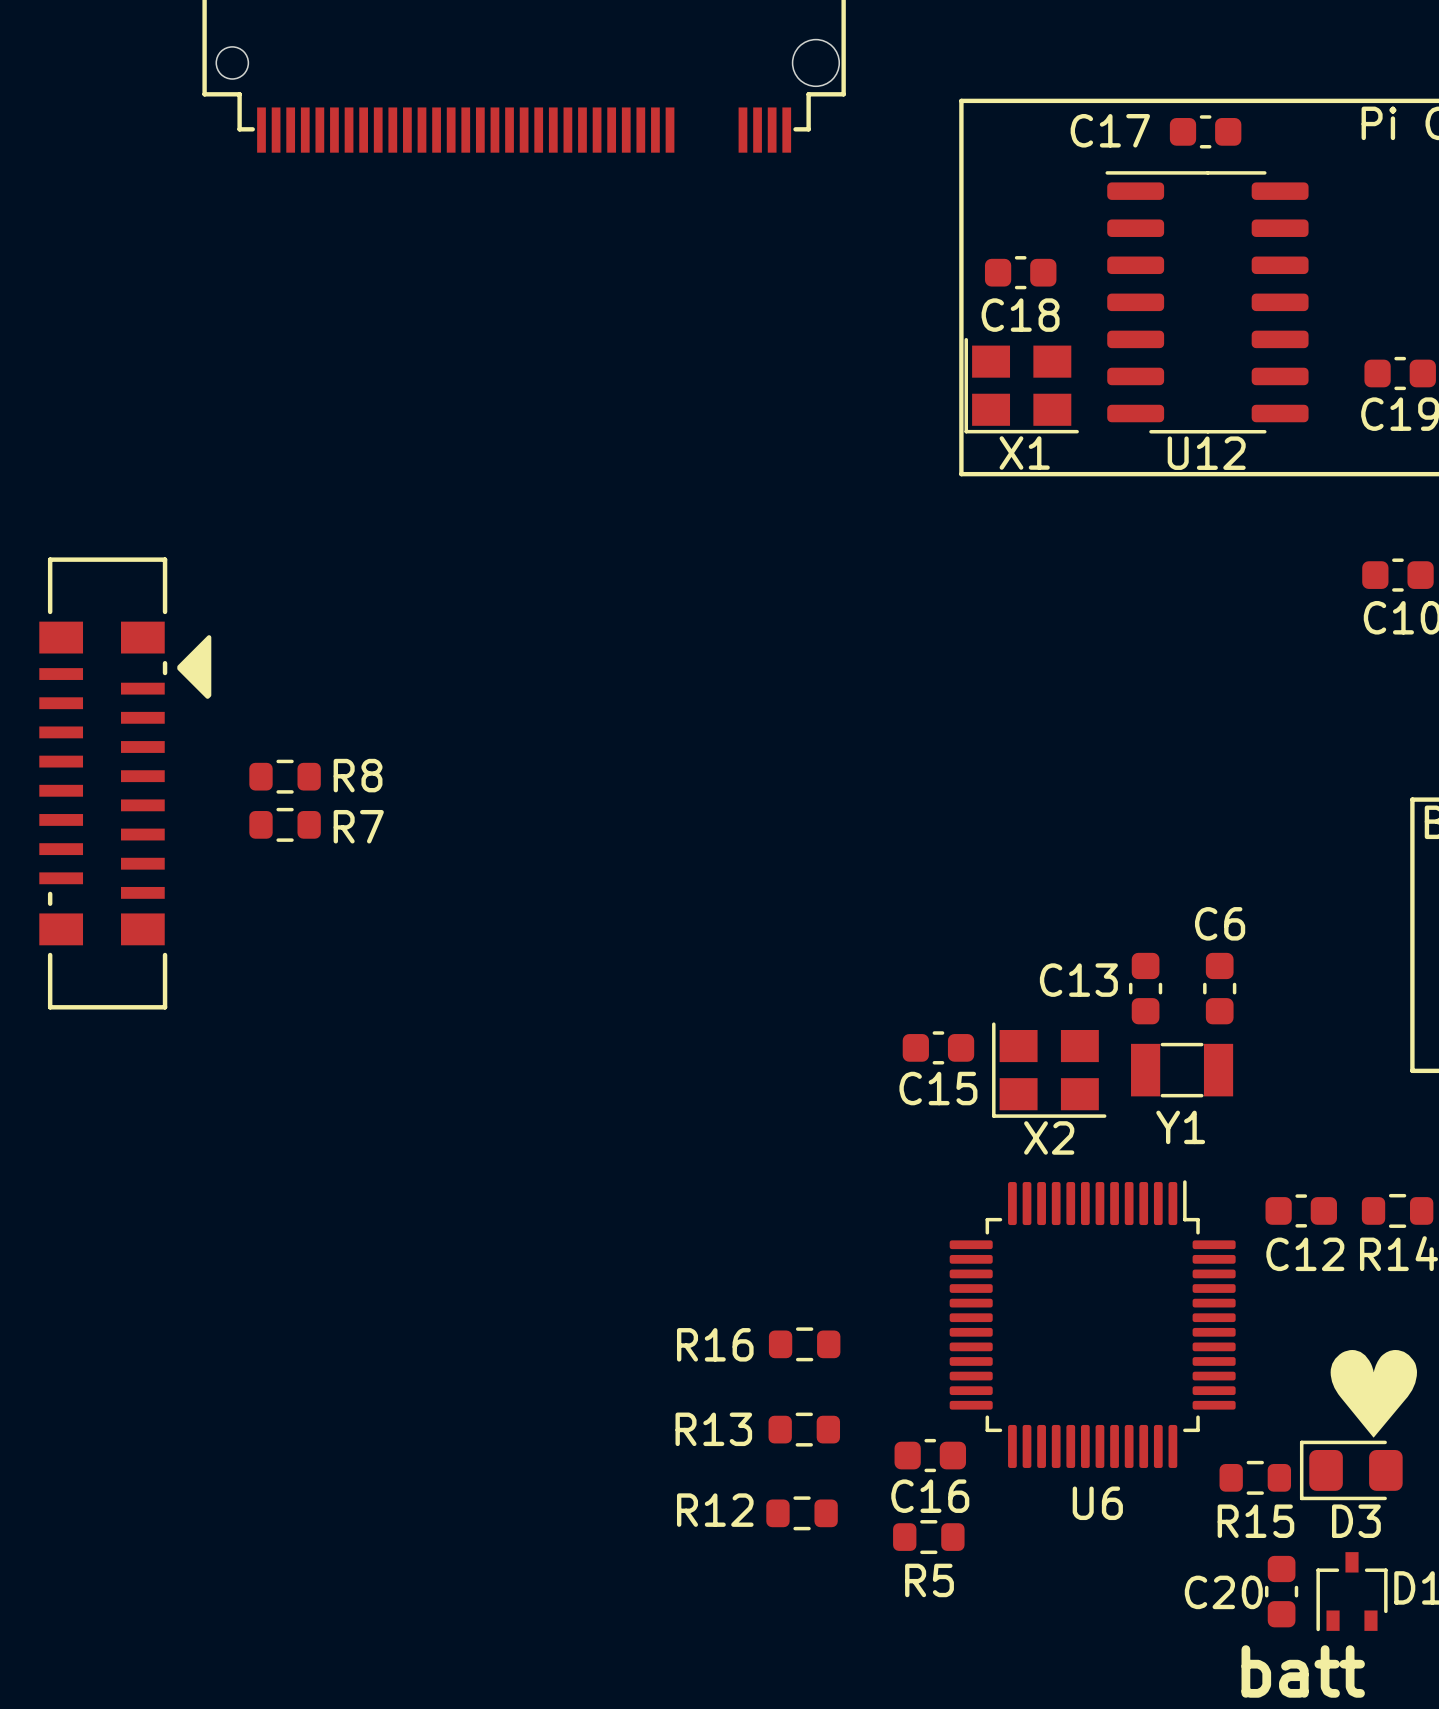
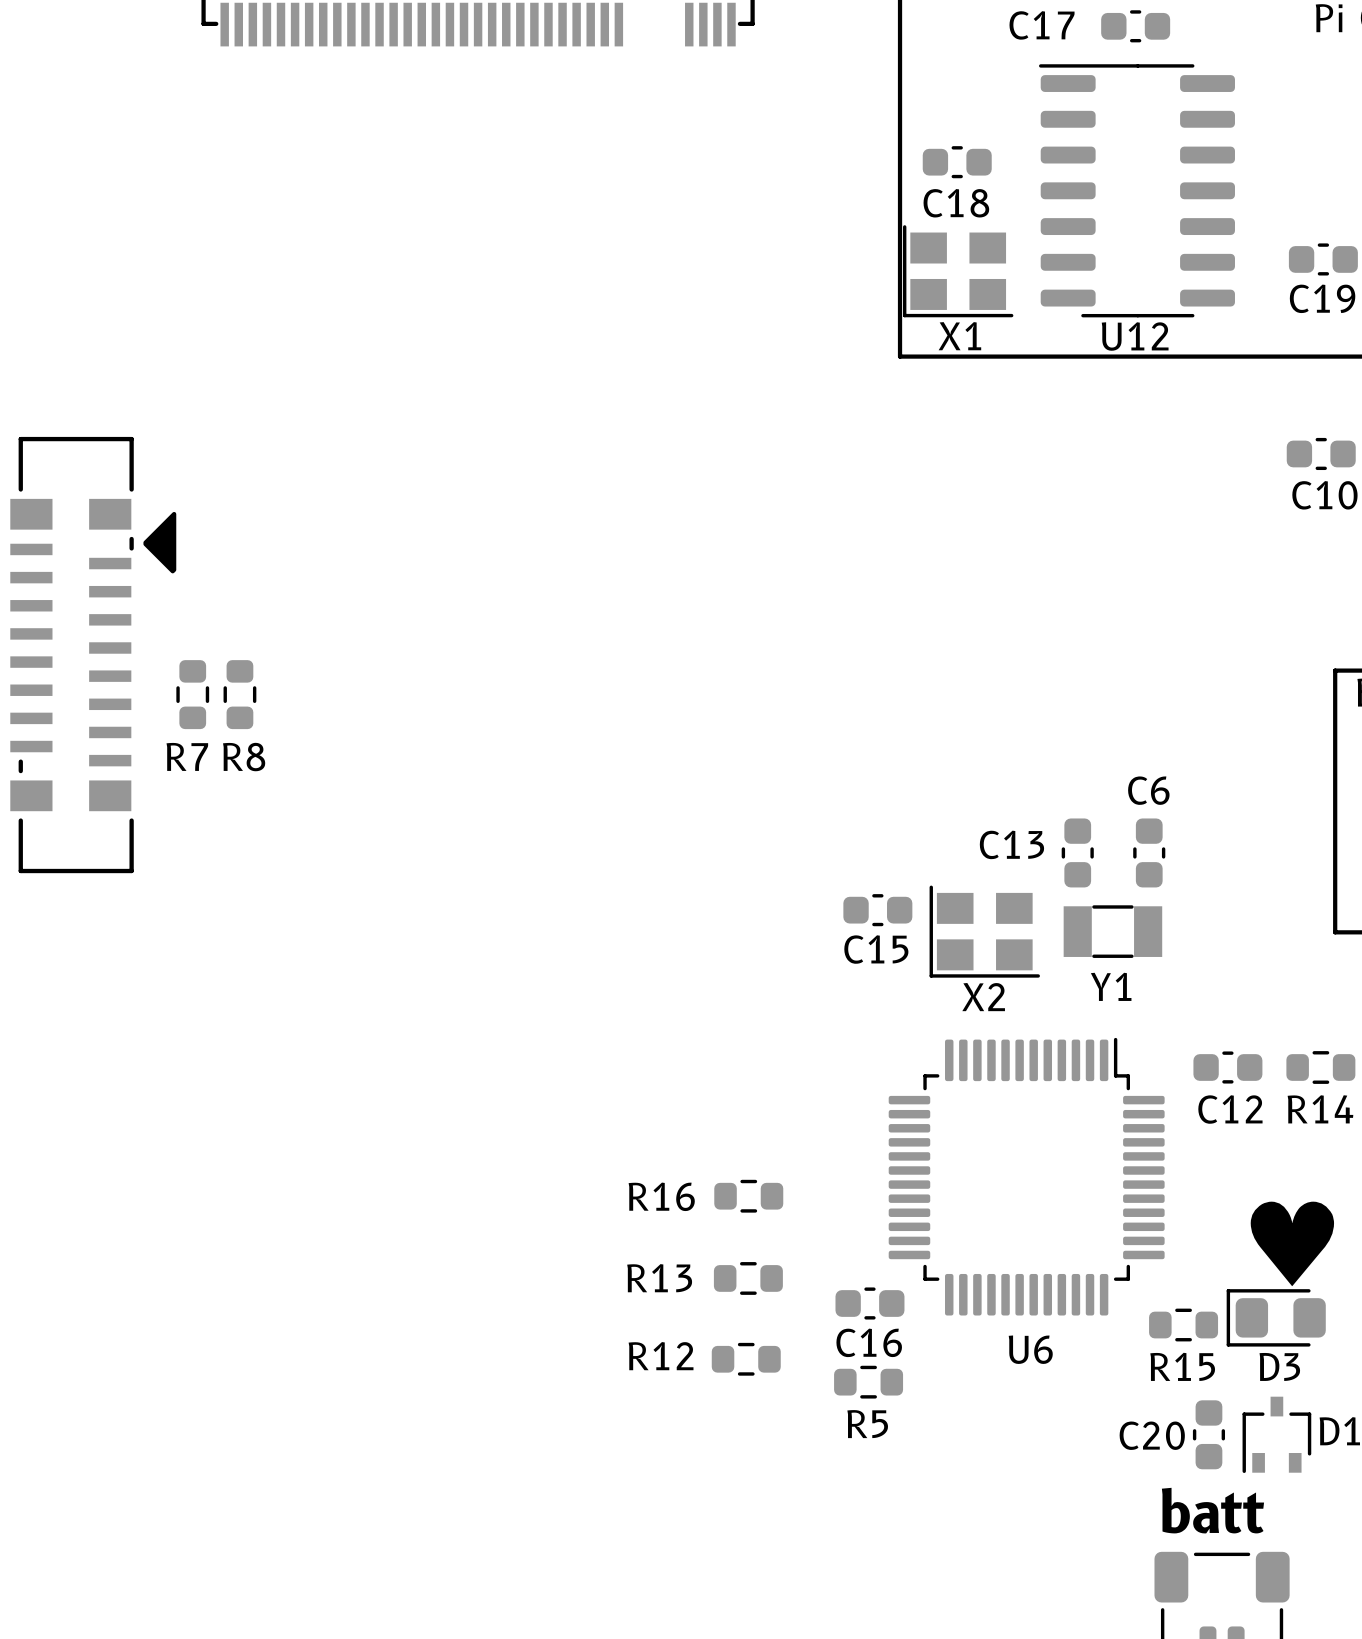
R8 rotation: 0° (285, 776) -> 90° clockwise (239, 694)
R8 position: (285, 776) -> (239, 694)
R7 rotation: 0° (285, 824) -> 90° clockwise (192, 694)
R7 position: (285, 824) -> (192, 694)

